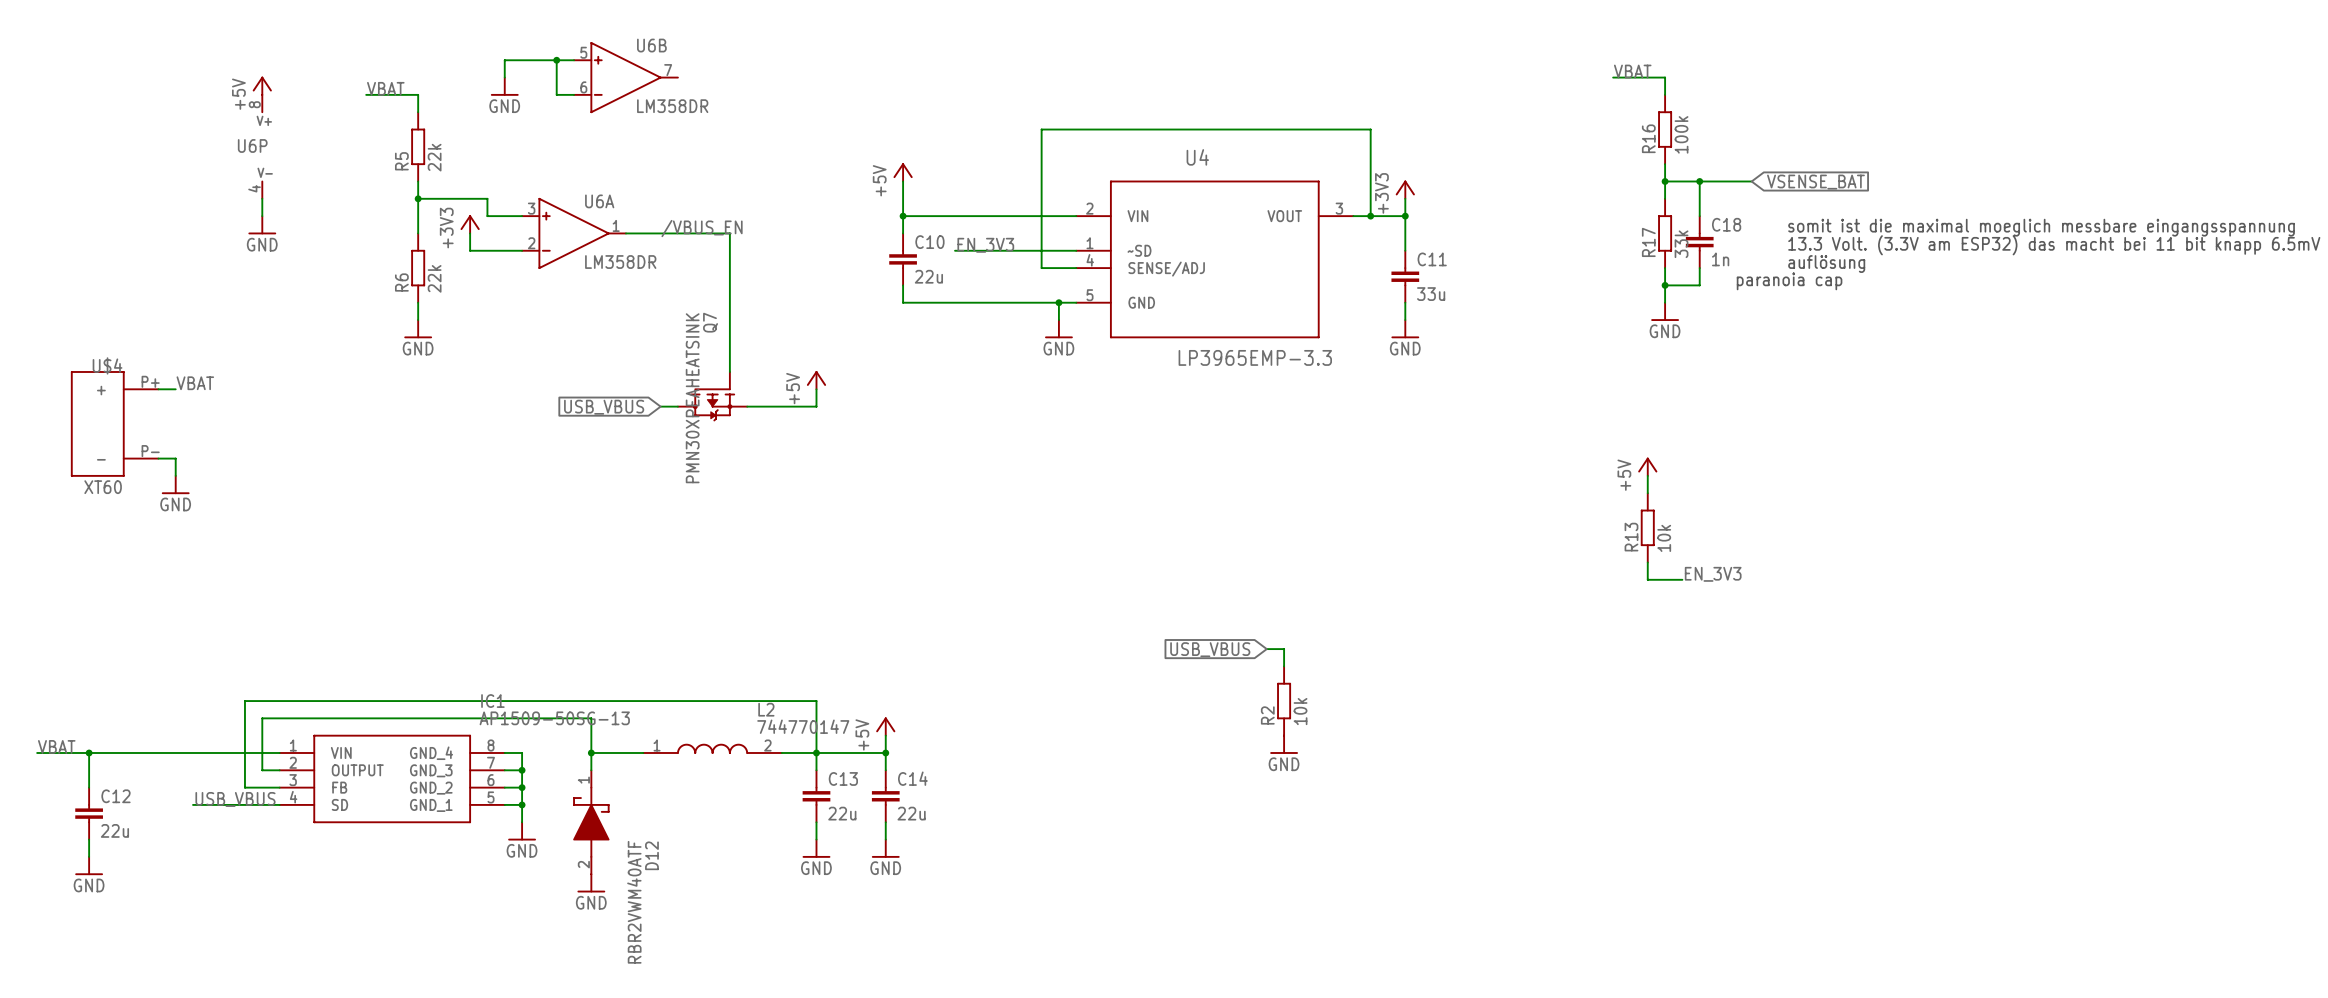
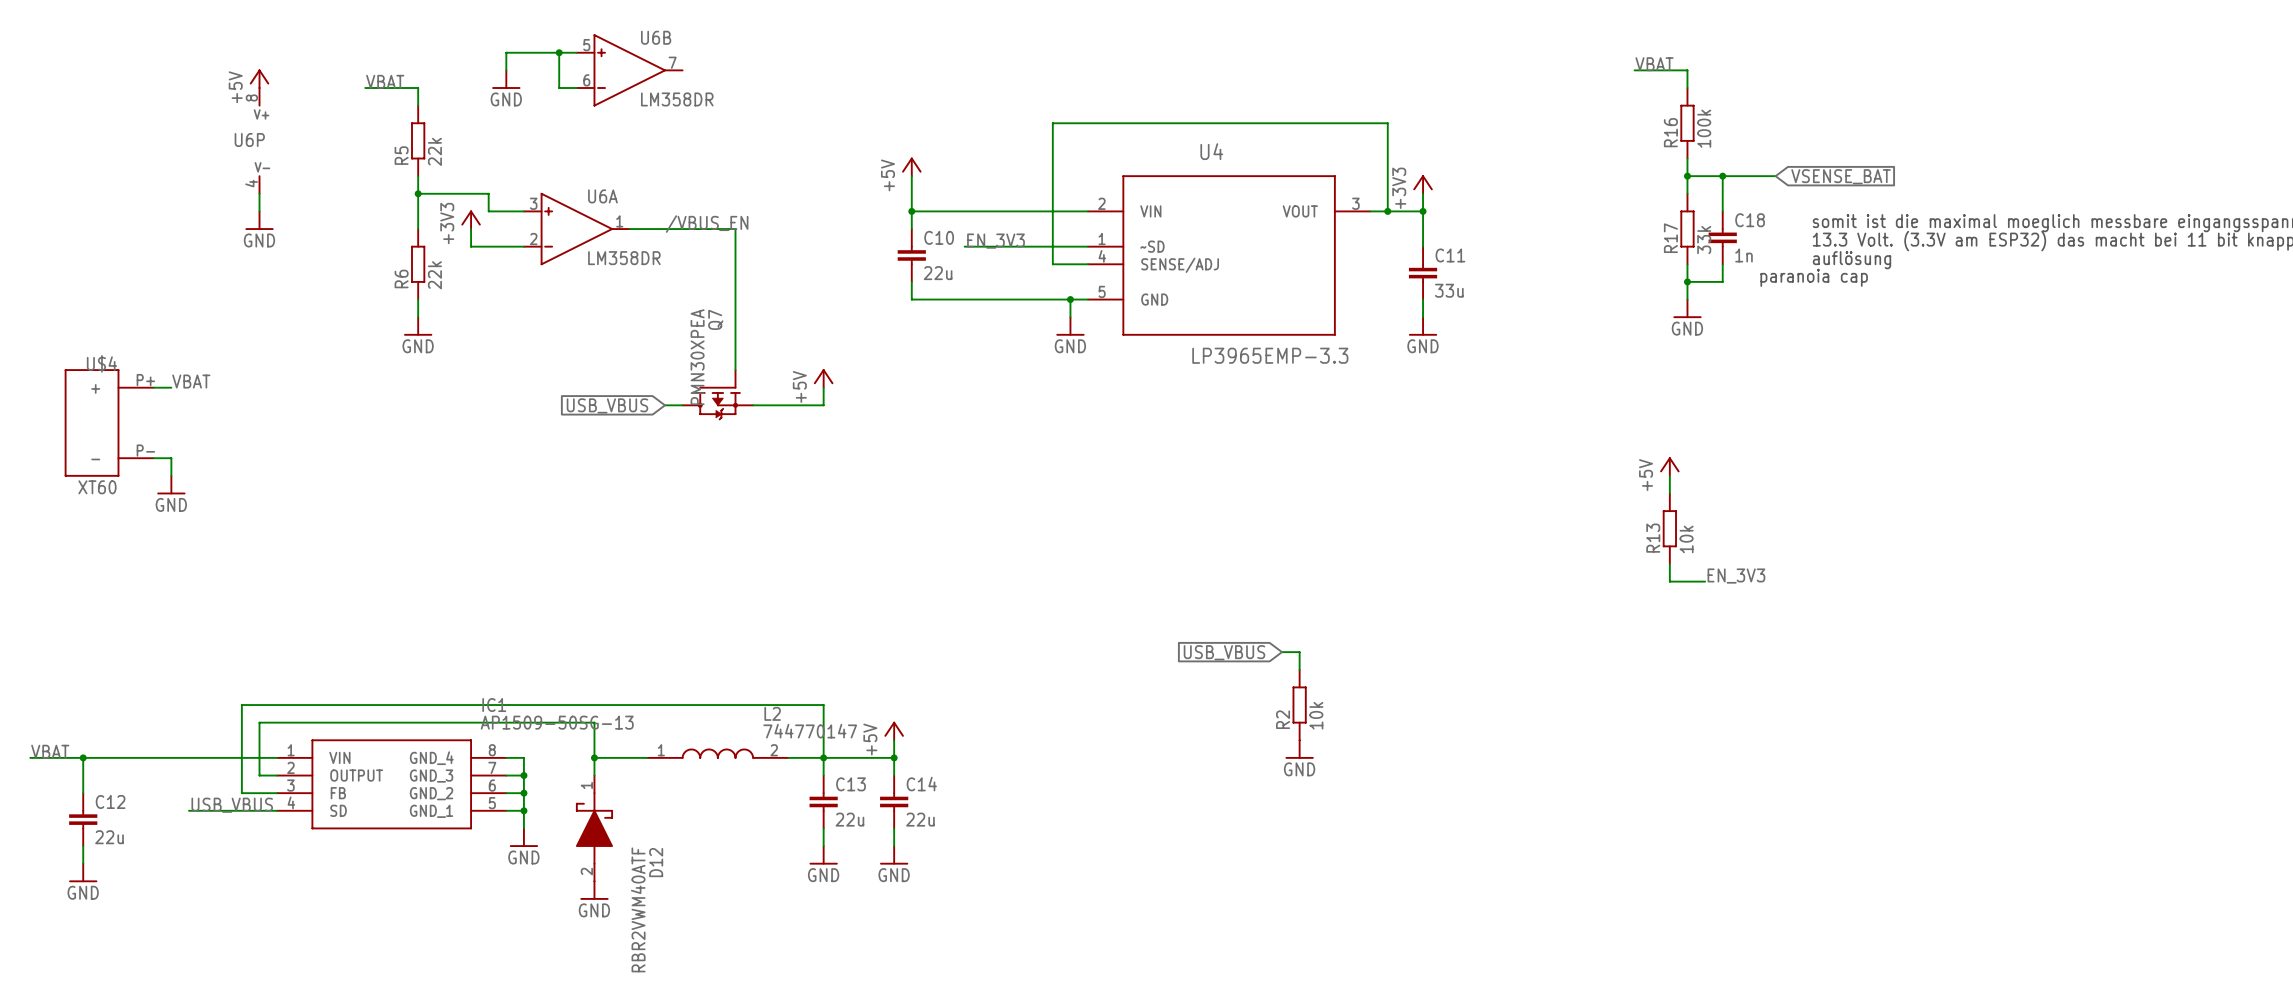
Q7 value: PMN30XPEAHEATSINK (692, 398) -> PMN30XPEA (697, 357)

